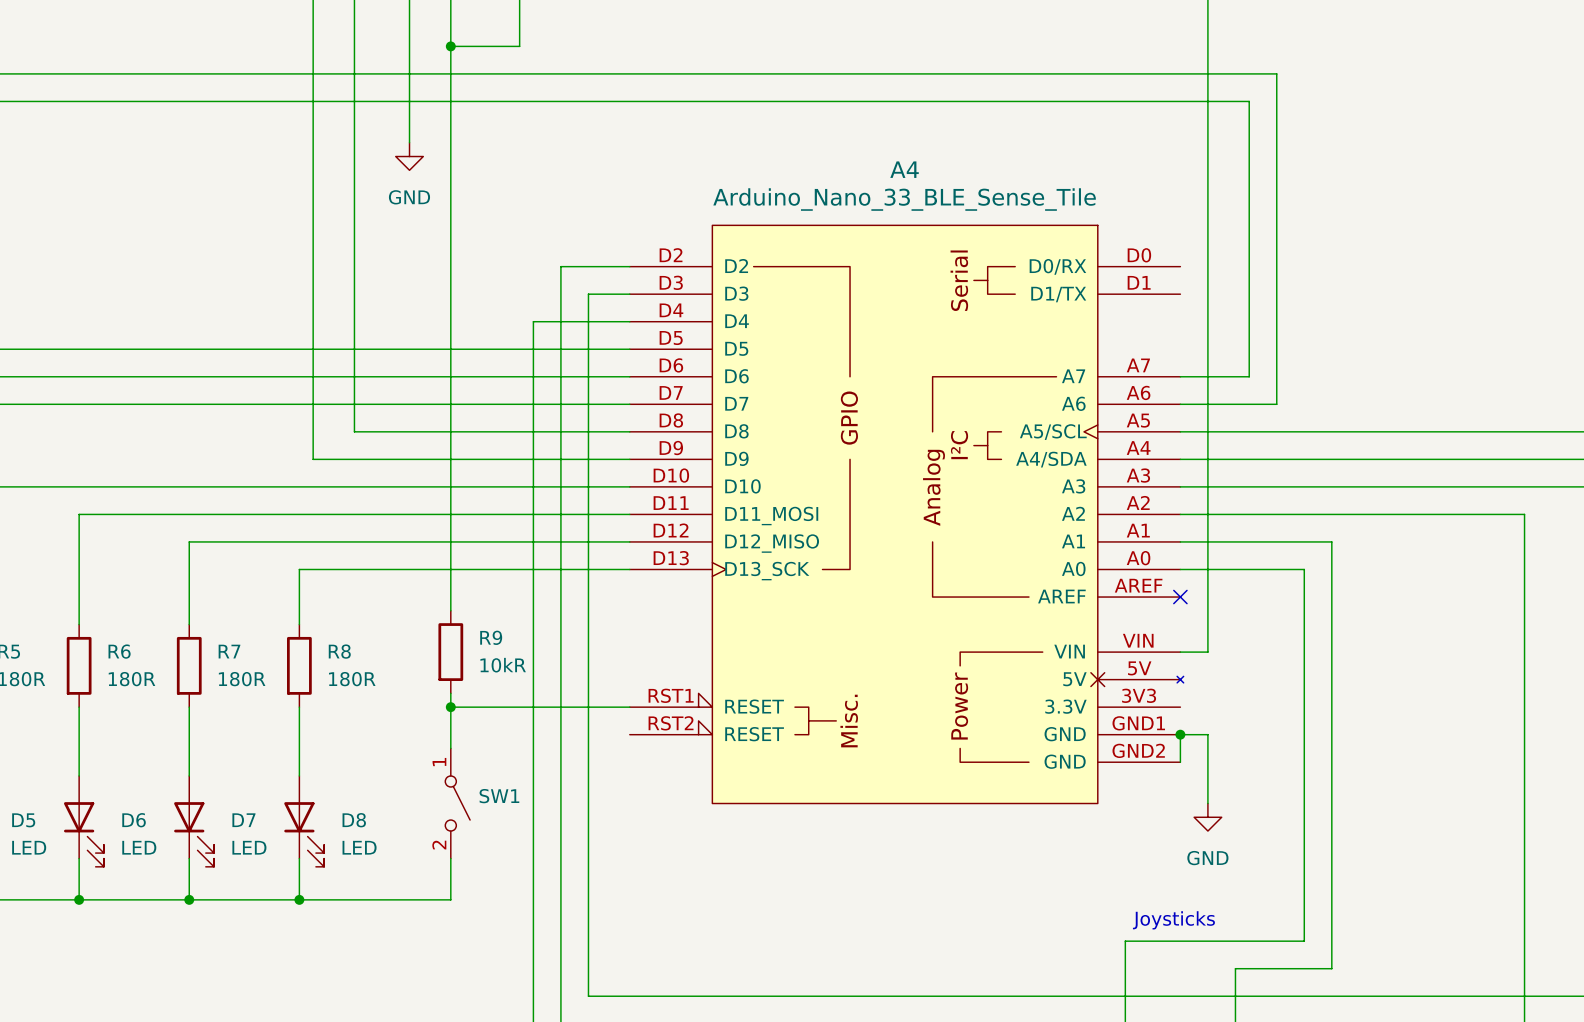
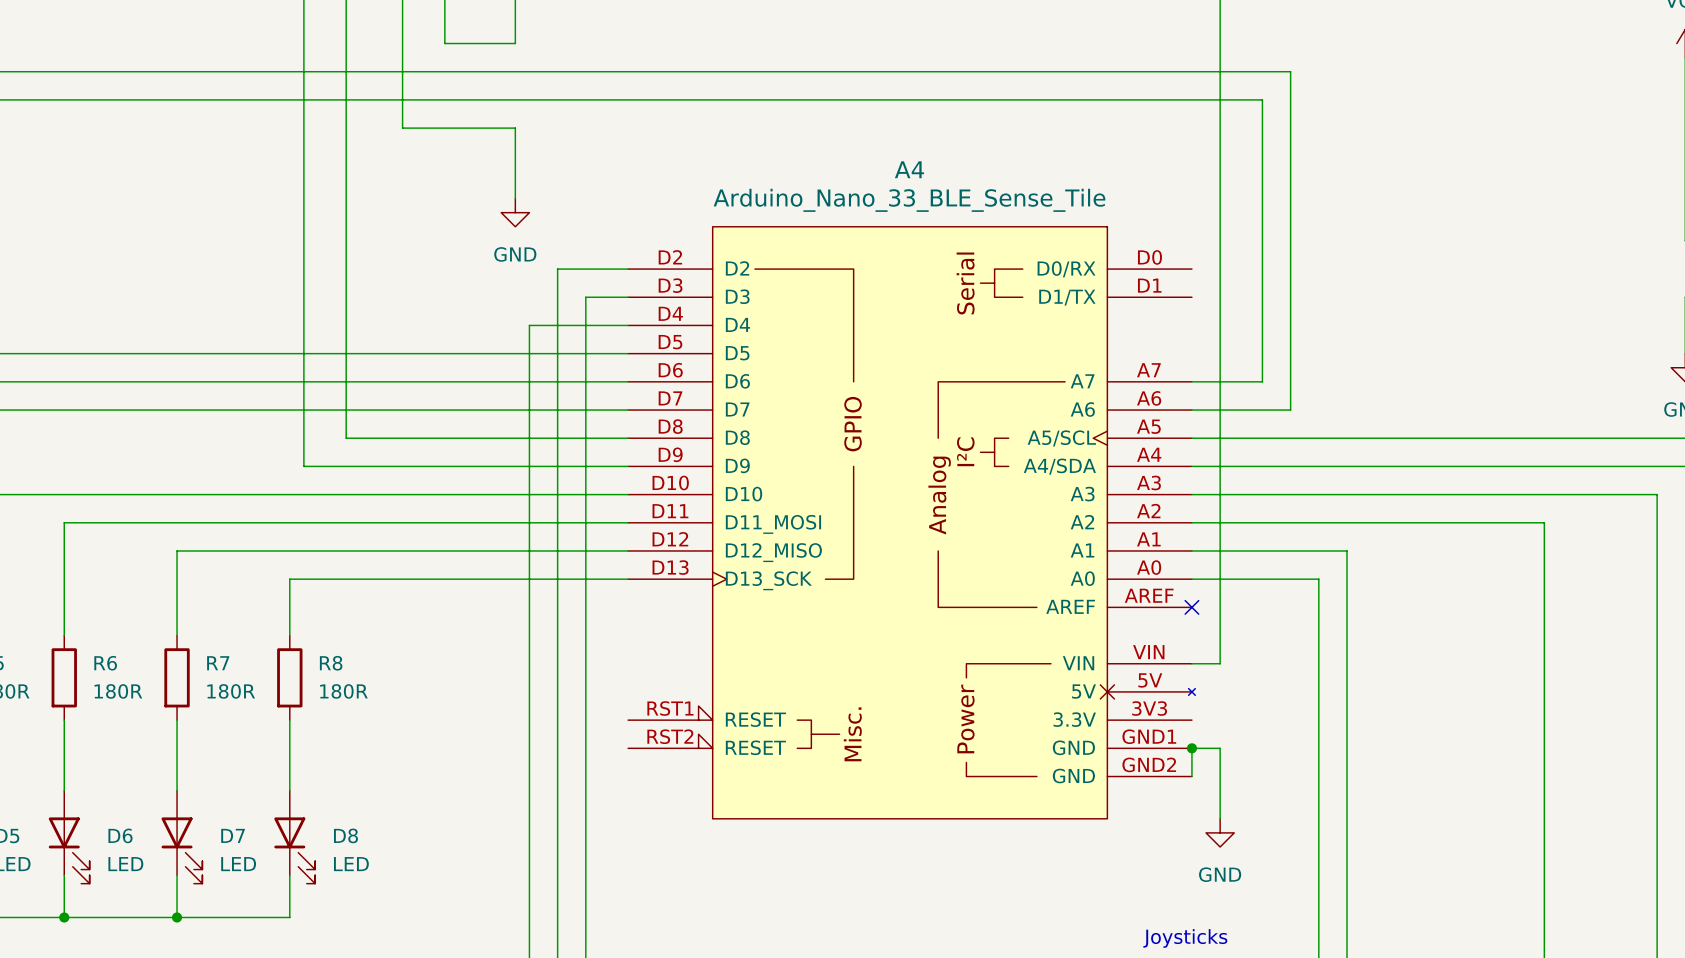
wire: (450, 46) (450, 610) -> none
junction: (450, 46) -> none
wire: (409, 128) (409, 142) -> (402, 128) (515, 128) (515, 198)
power symbol position: GND (409, 156) -> GND (515, 212)
R9: 10kR (450, 652) -> none
wire: (450, 693) (450, 748) -> none
wire: (450, 707) (629, 707) -> none
junction: (450, 707) -> none
SW1: (457, 803) -> none
wire: (450, 858) (450, 899) (299, 899) -> none
junction: (299, 899) -> none

